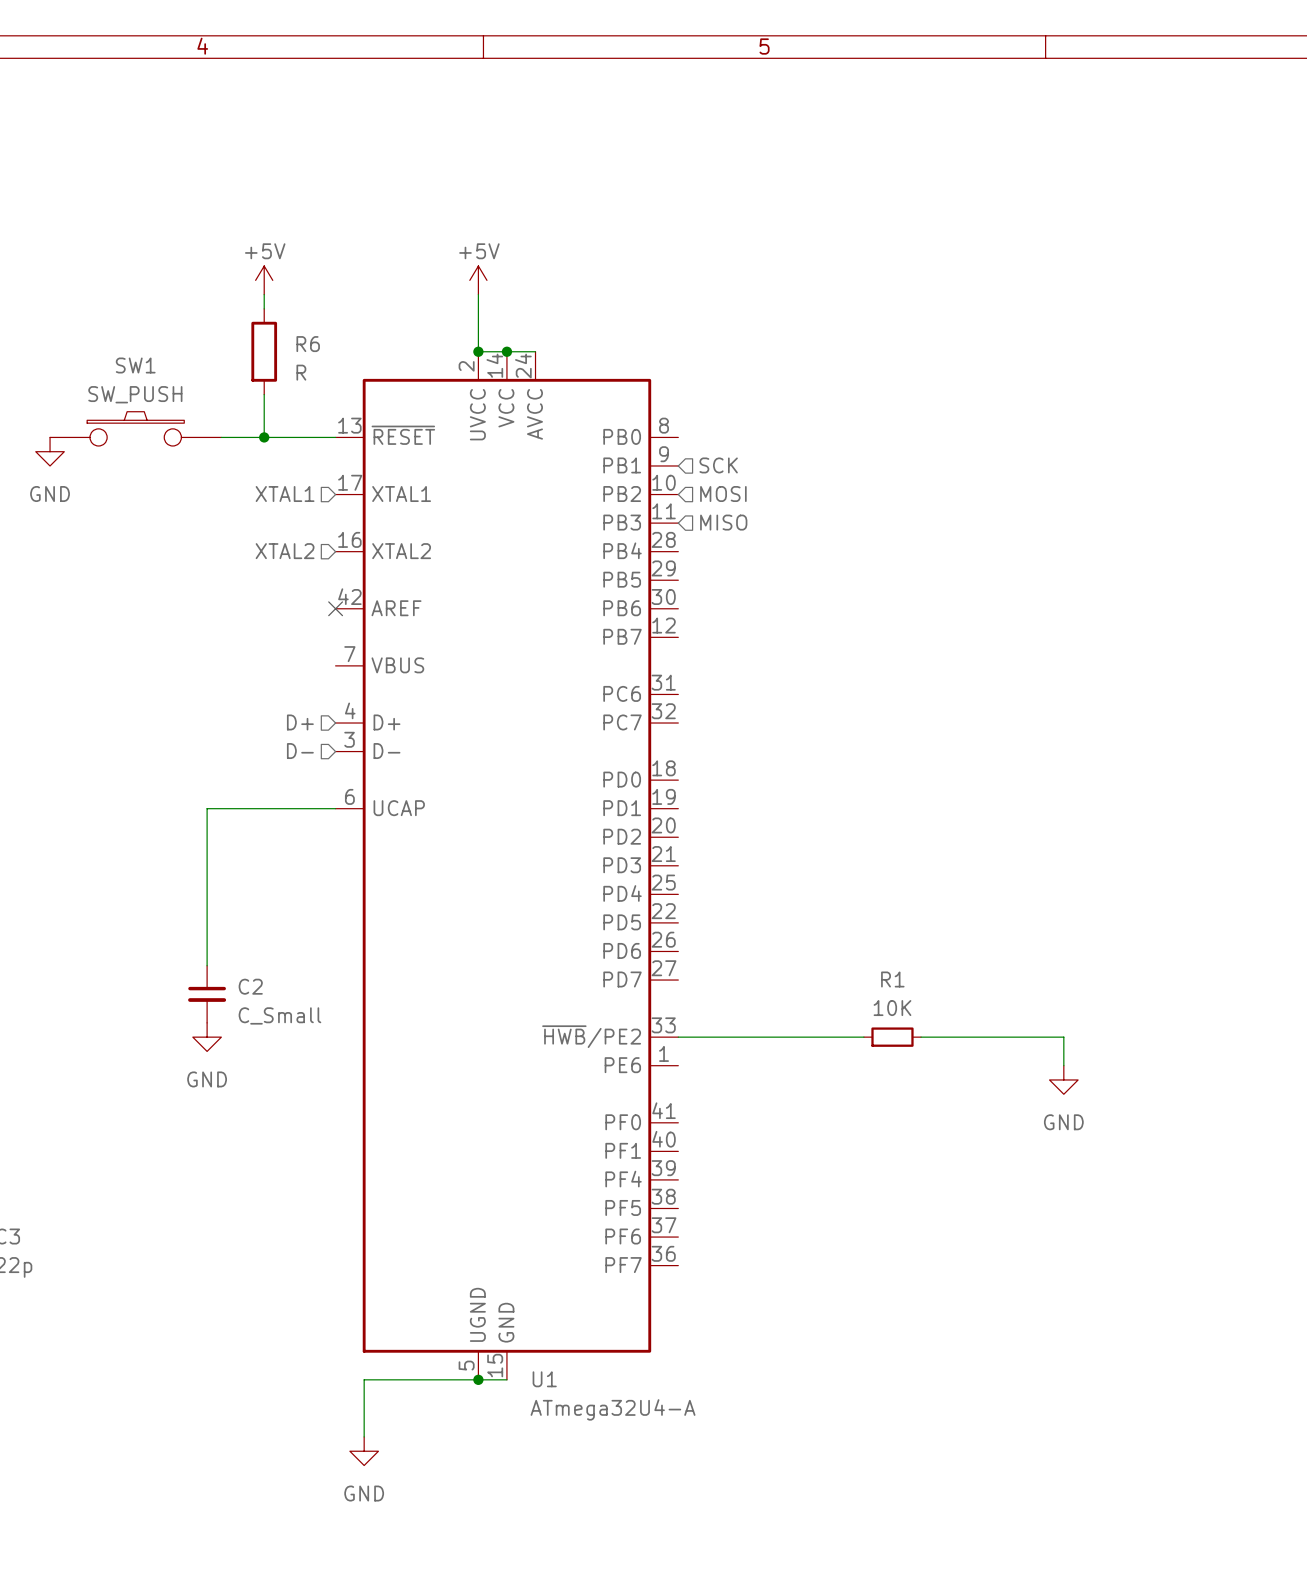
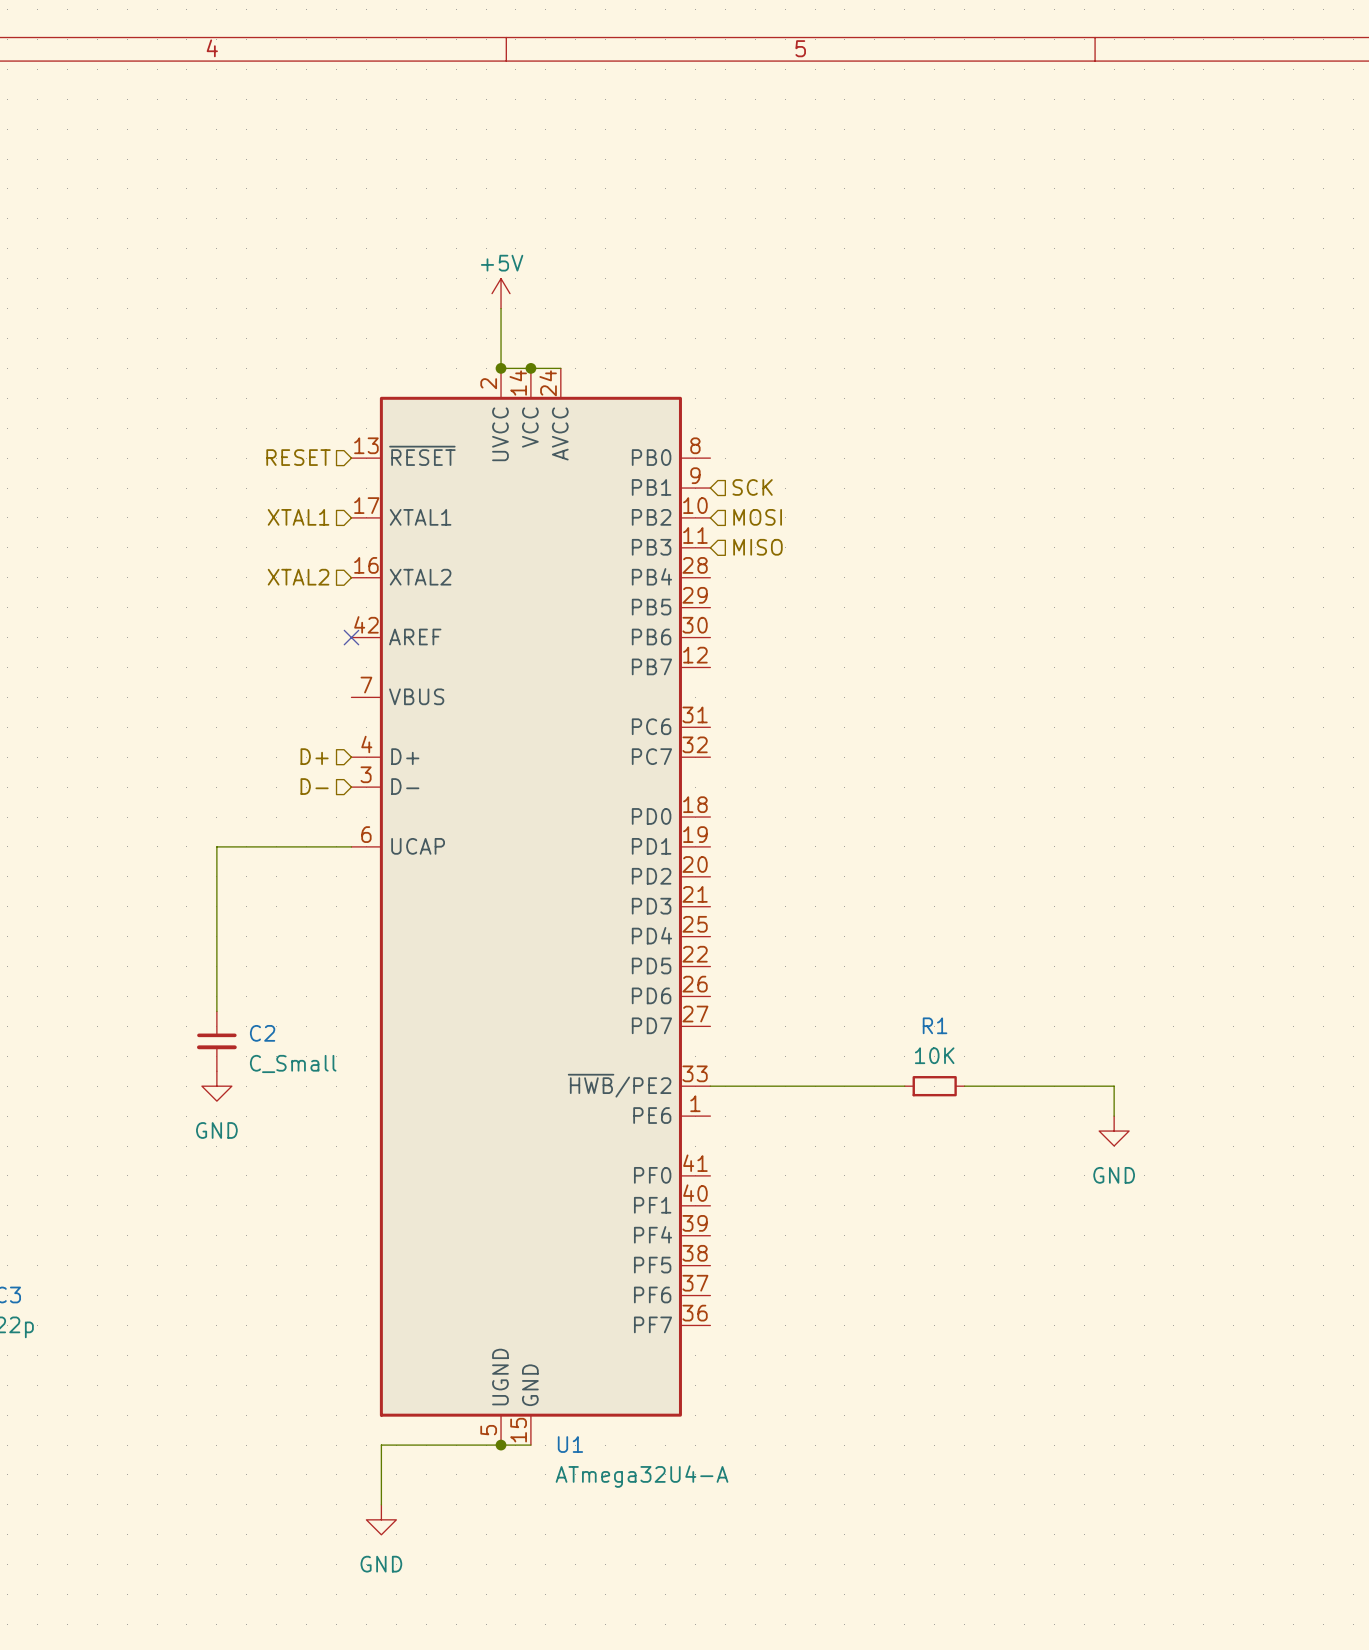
power symbol: +5V (264, 280) -> none
wire: (264, 294) (264, 308) -> none
R6: R (264, 351) -> none
wire: (264, 394) (264, 437) -> none
SW1: SW_PUSH (135, 428) -> none
hierarchical label: none -> RESET (298, 457)
wire: (221, 437) (335, 437) -> none
junction: (264, 437) -> none
power symbol: GND (50, 451) -> none

